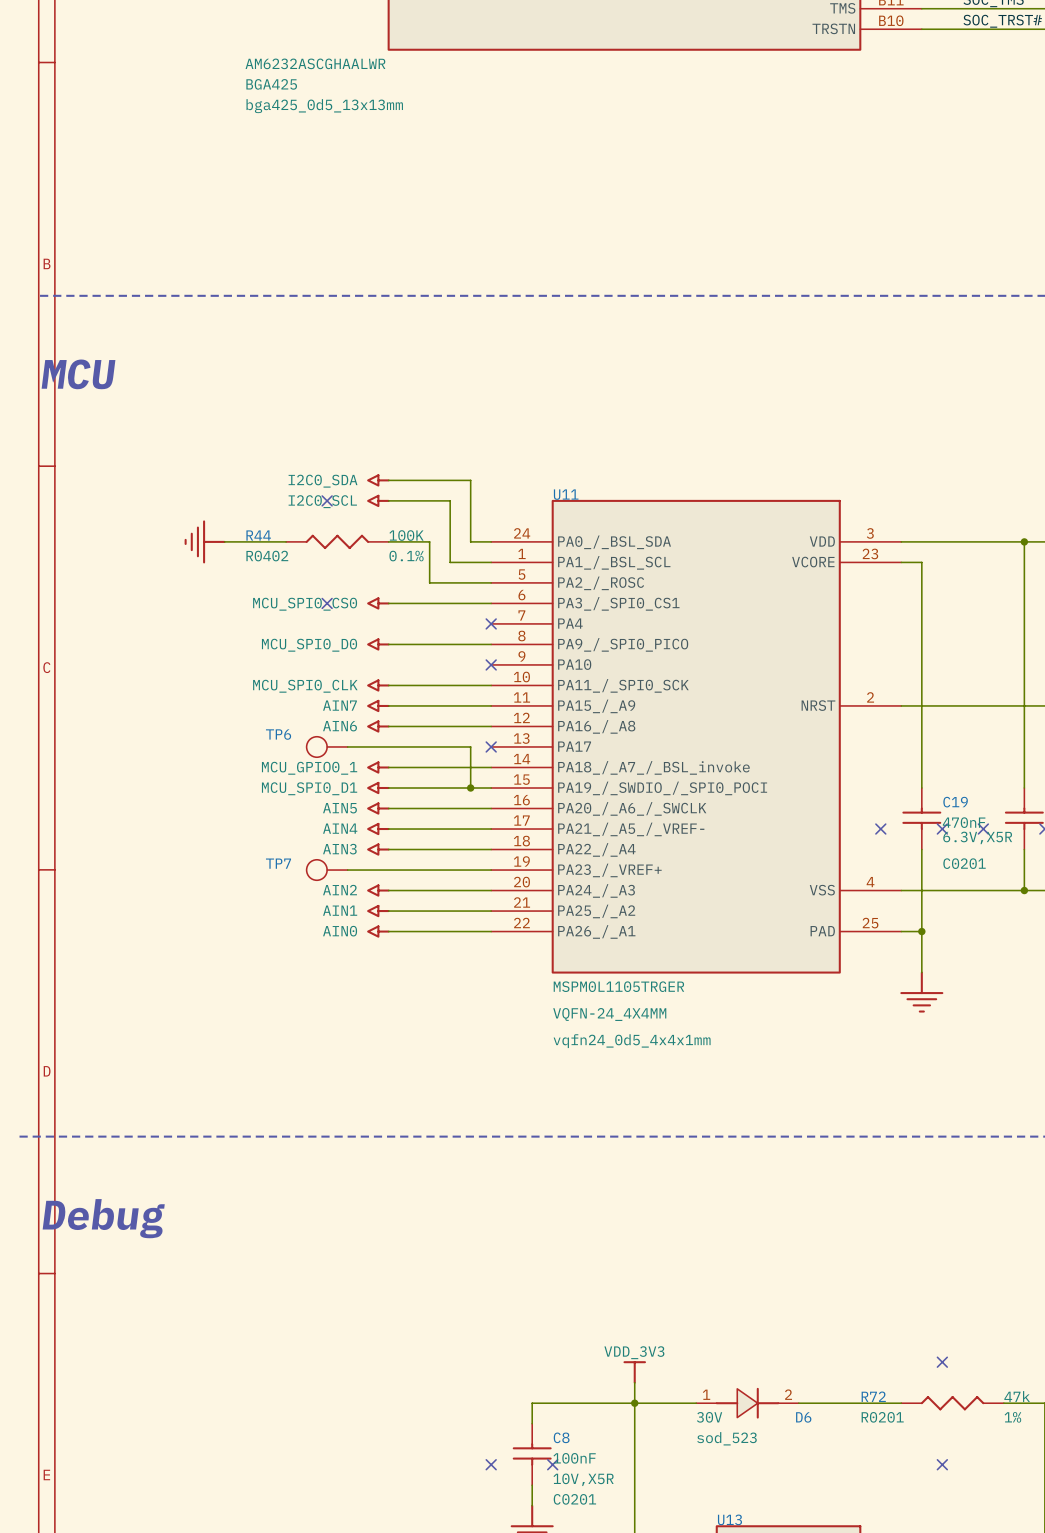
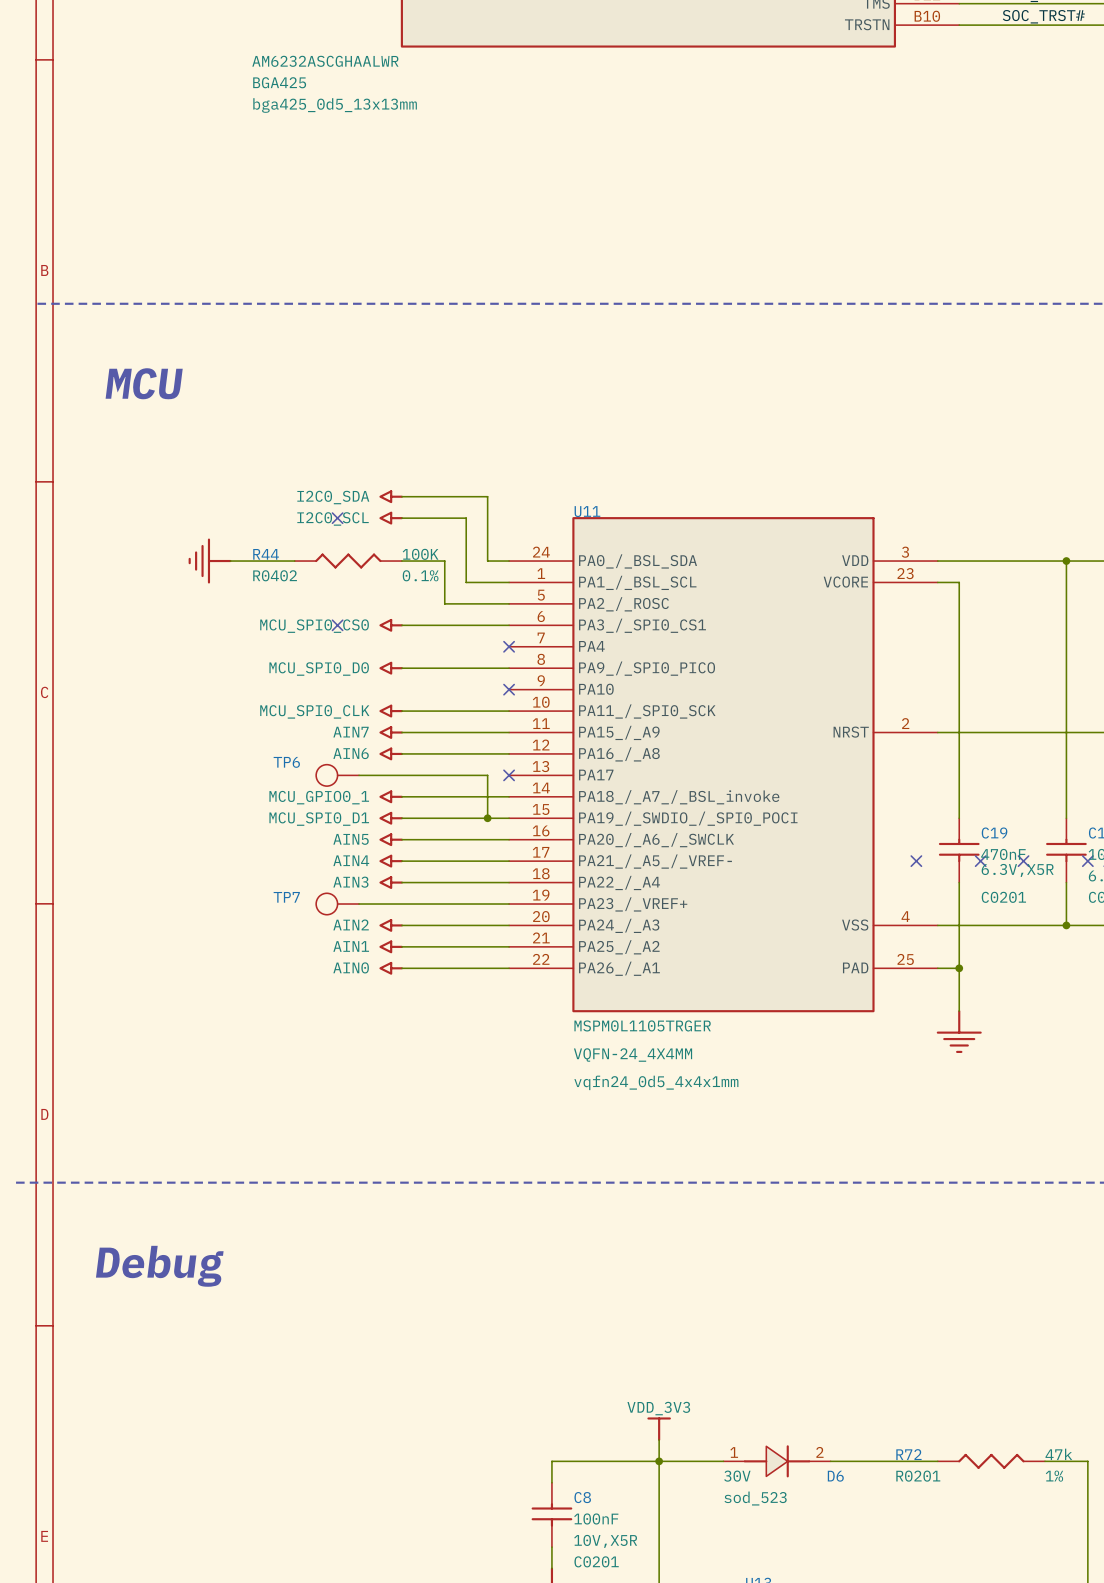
text position: MCU (78, 374) -> MCU (144, 383)
text position: Debug (103, 1218) -> Debug (159, 1266)
no-connect mark: (942, 1362) -> none
no-connect mark: (491, 1464) -> none
no-connect mark: (552, 1464) -> none
no-connect mark: (942, 1464) -> none

